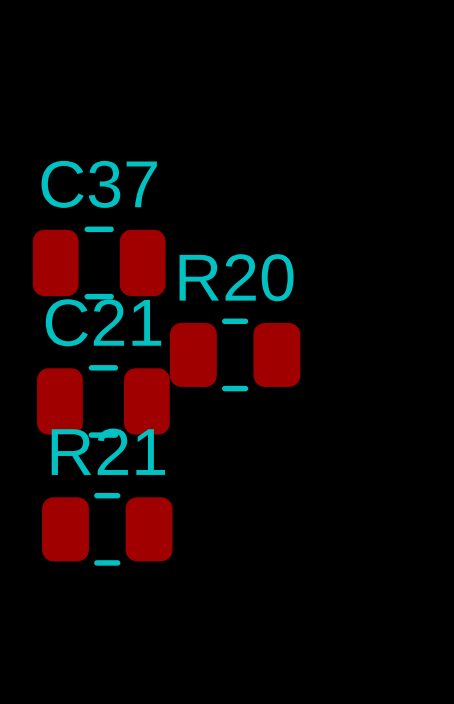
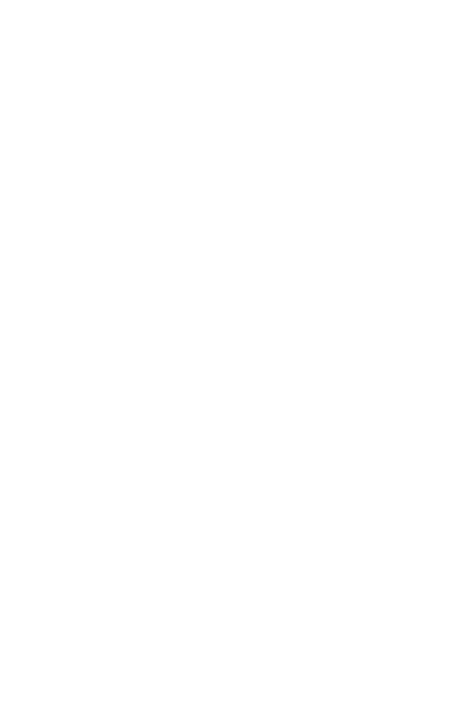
C37: (99, 262) -> none
R20: (235, 354) -> none
C21: (103, 401) -> none
R21: (107, 529) -> none

